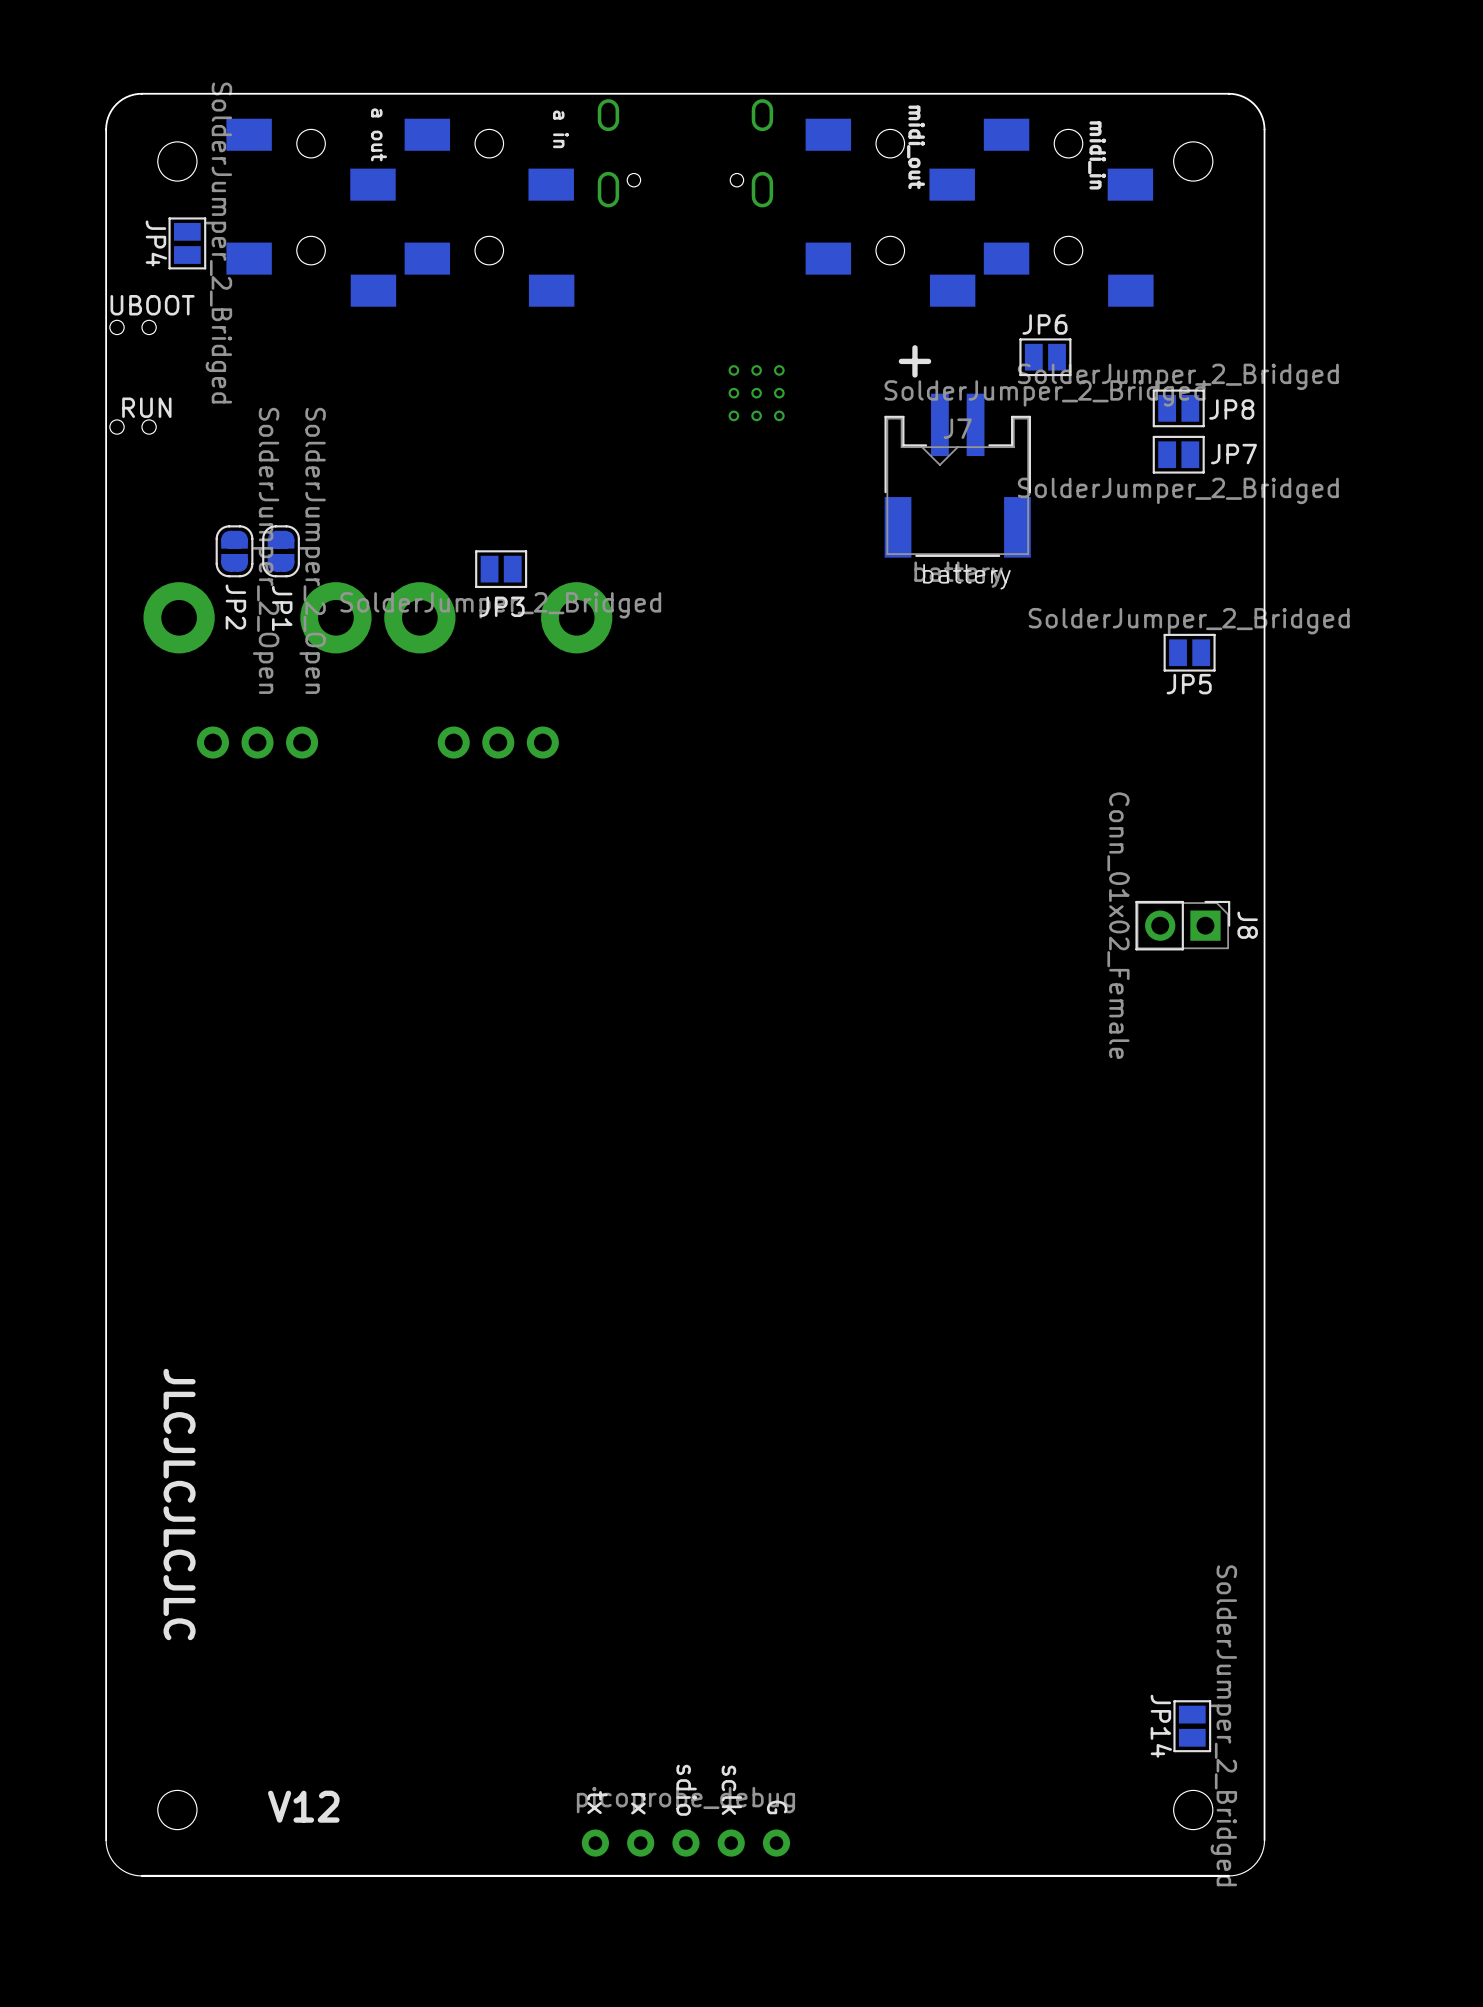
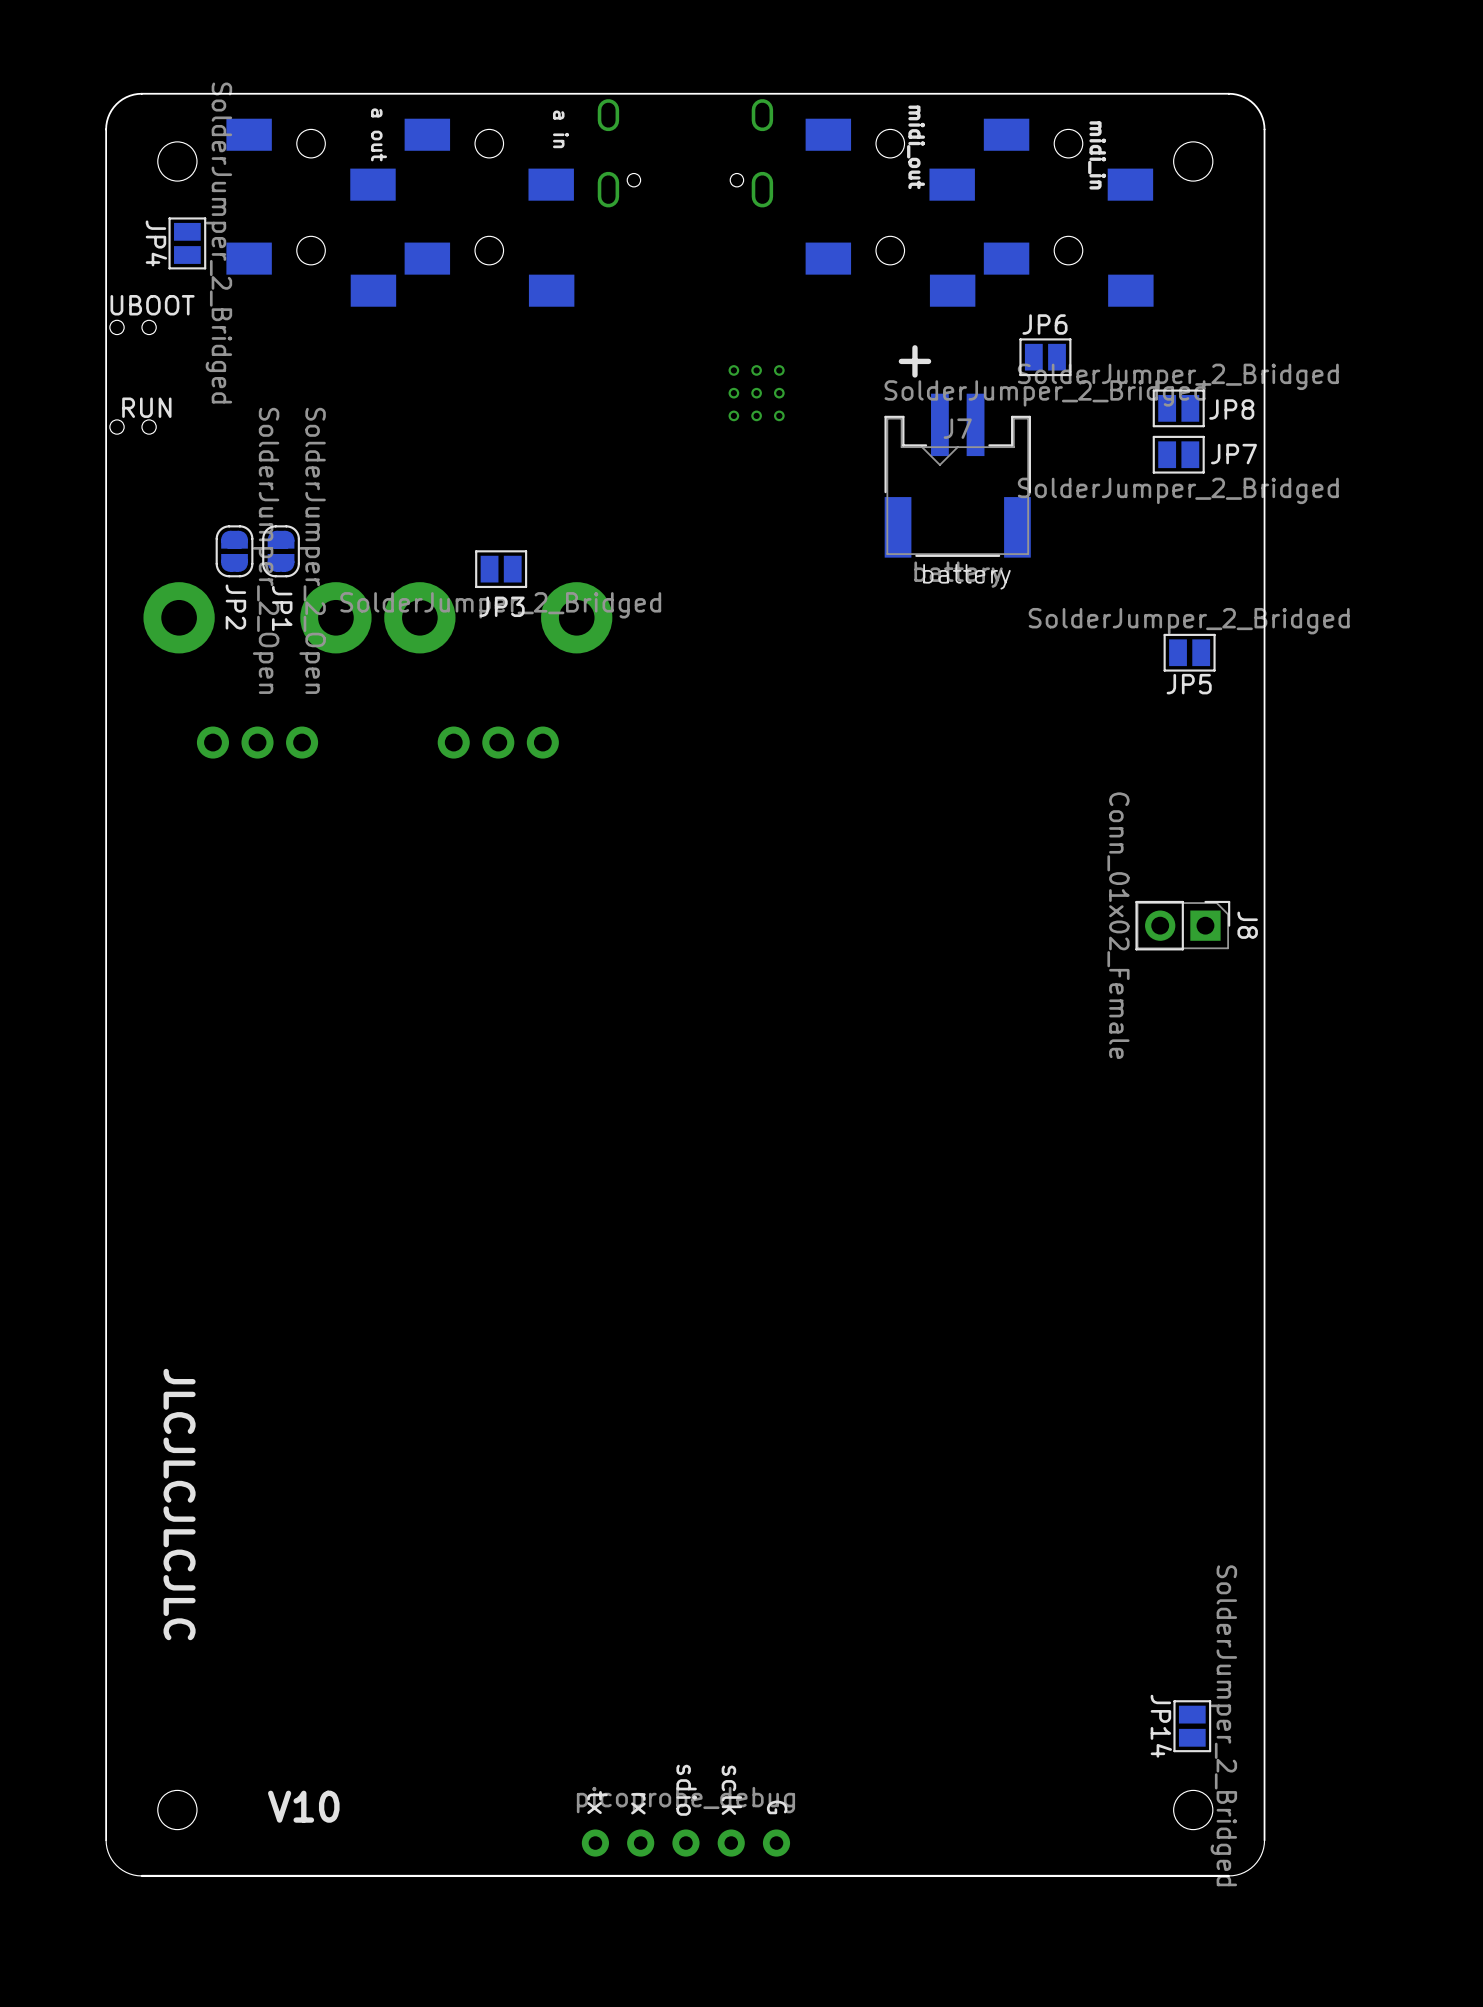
text: V12 (303, 1806) -> V10 (303, 1806)

